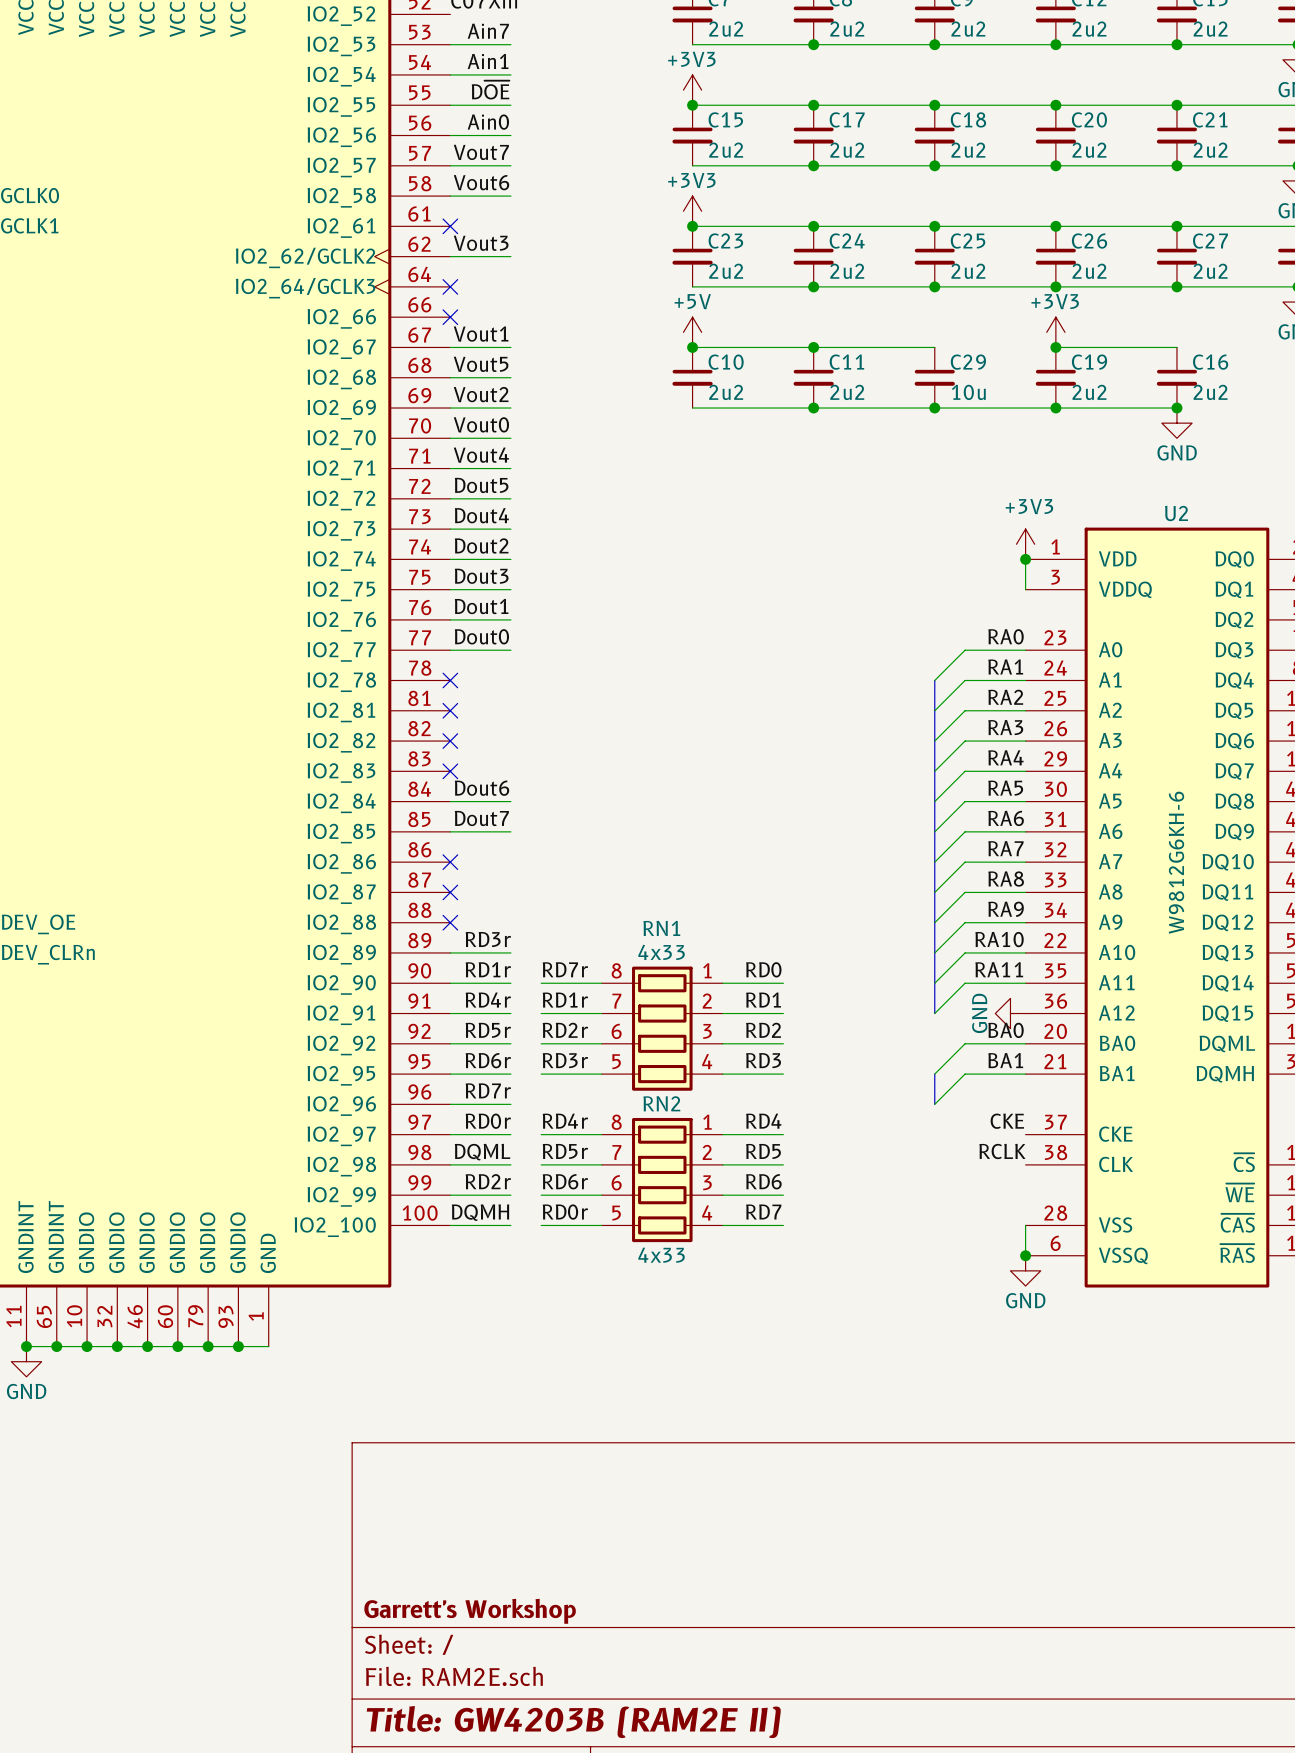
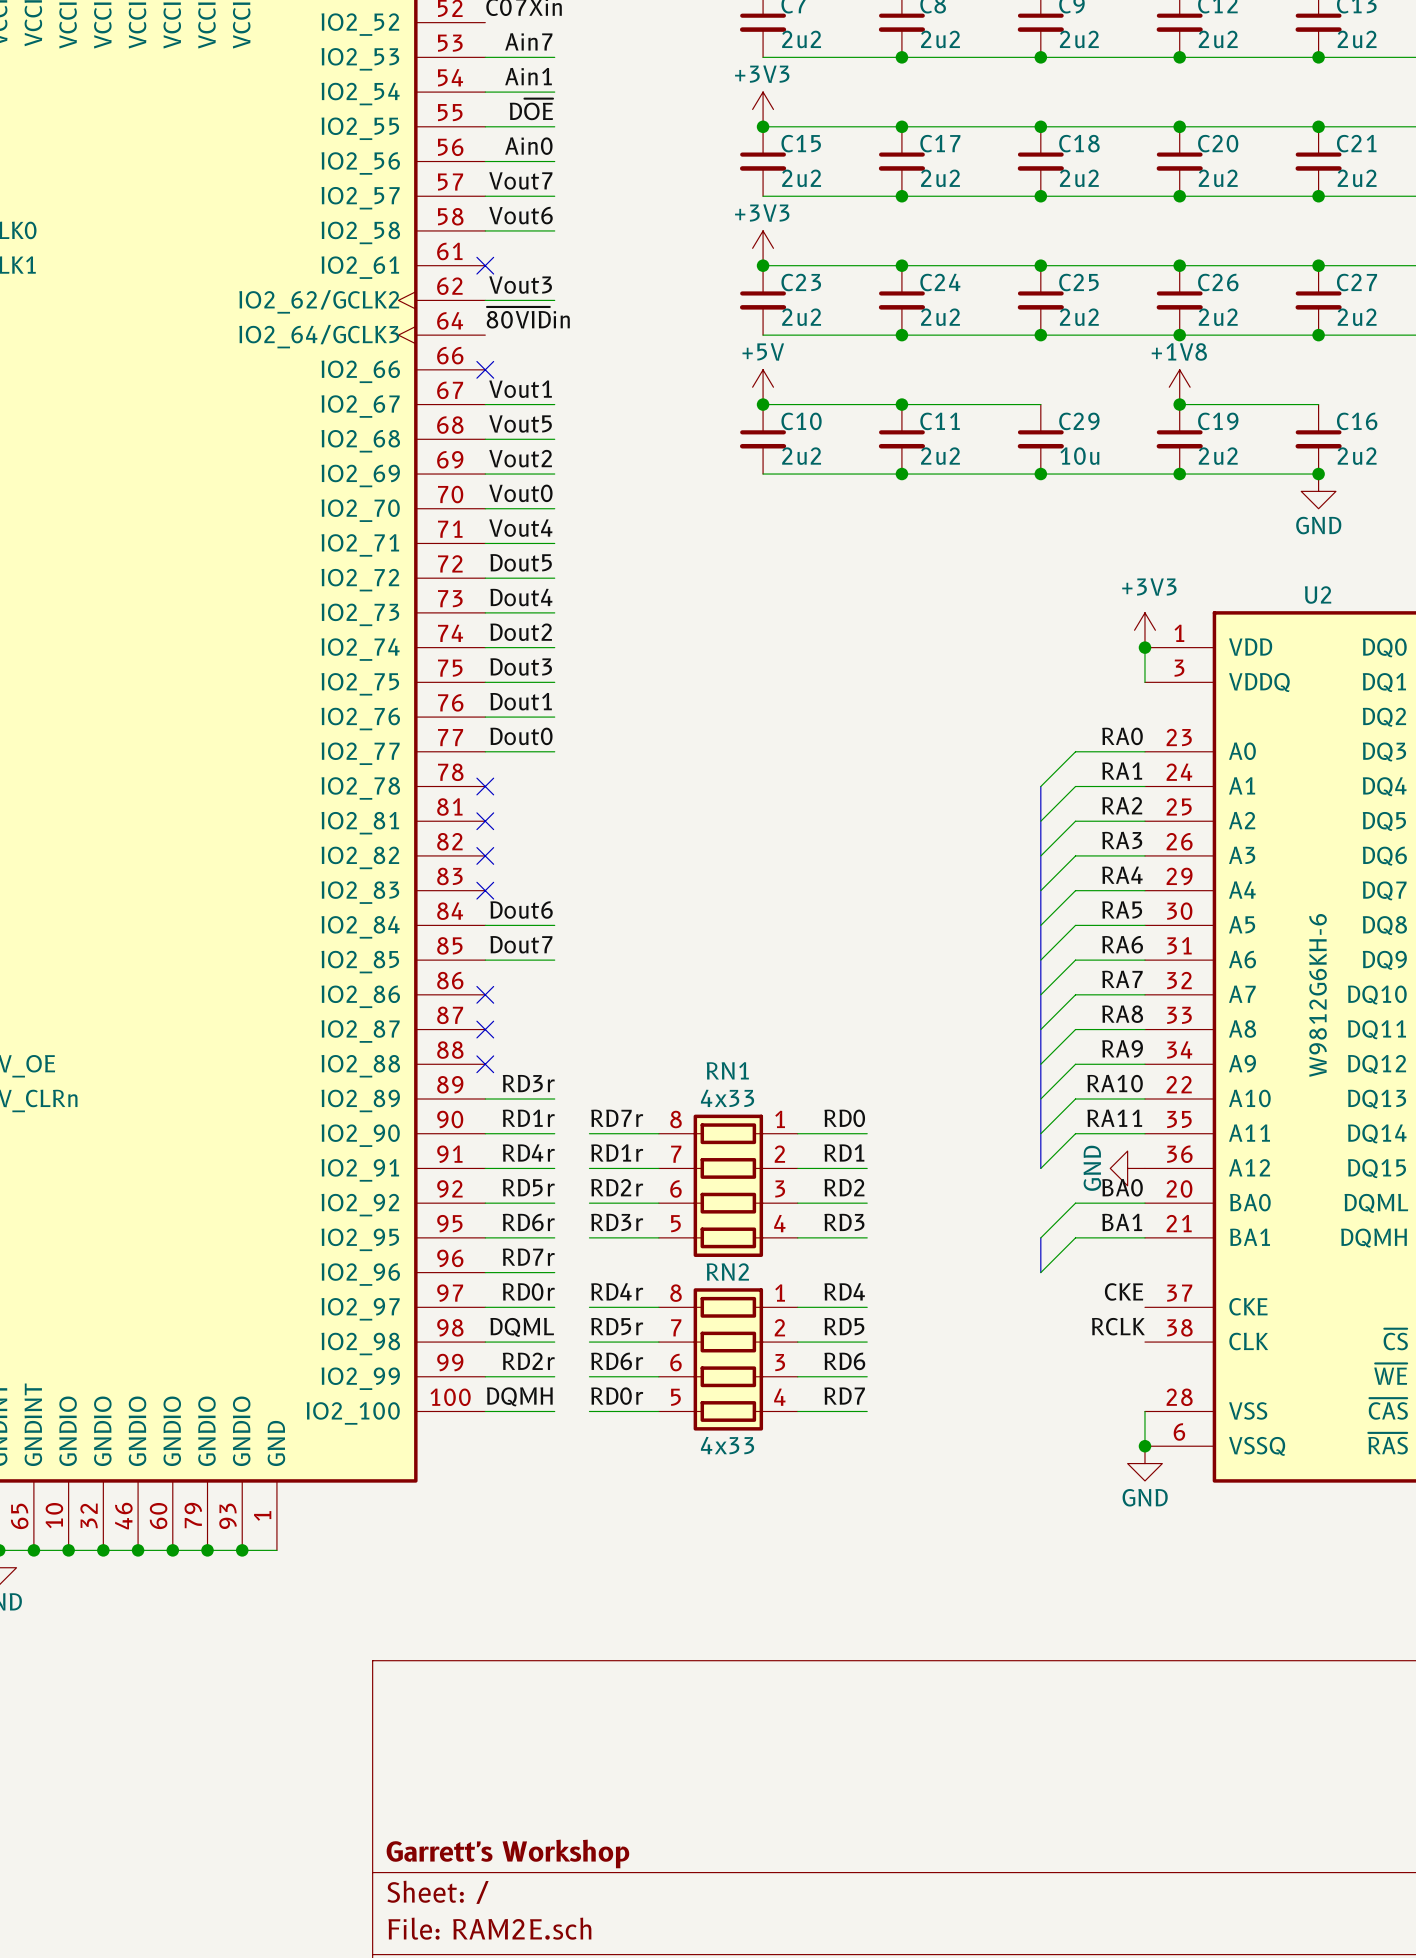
label: none -> ~{80VID}in (528, 317)
no-connect mark: (450, 286) -> none
power symbol: +3V3 (1055, 332) -> +1V8 (1179, 387)

